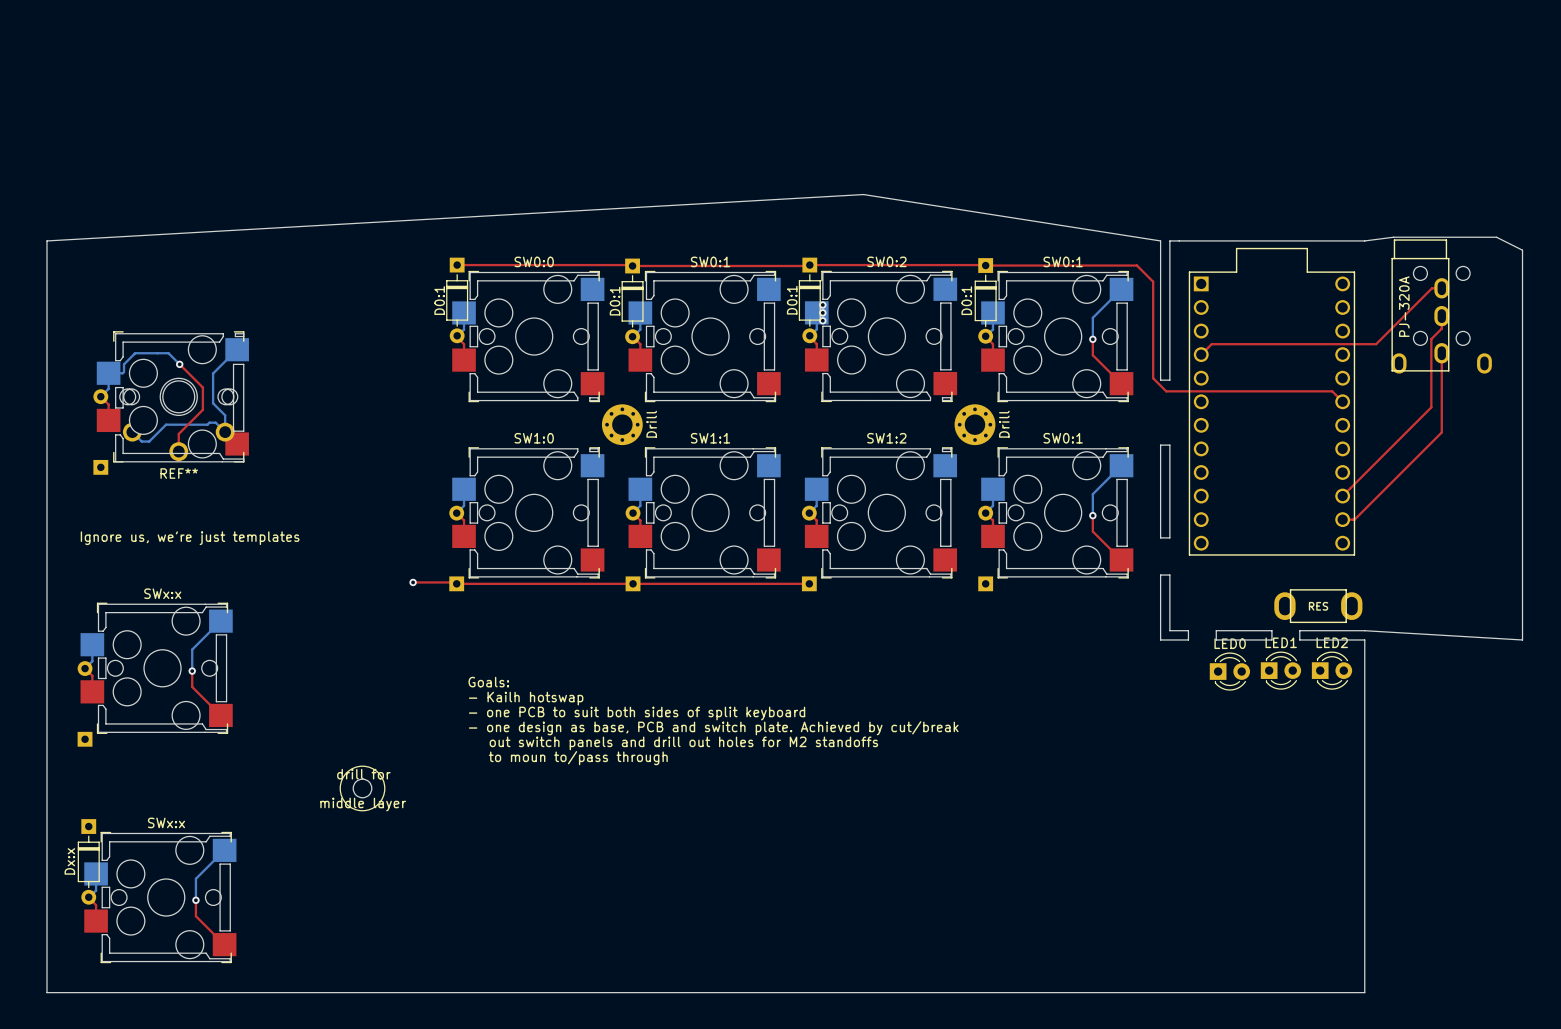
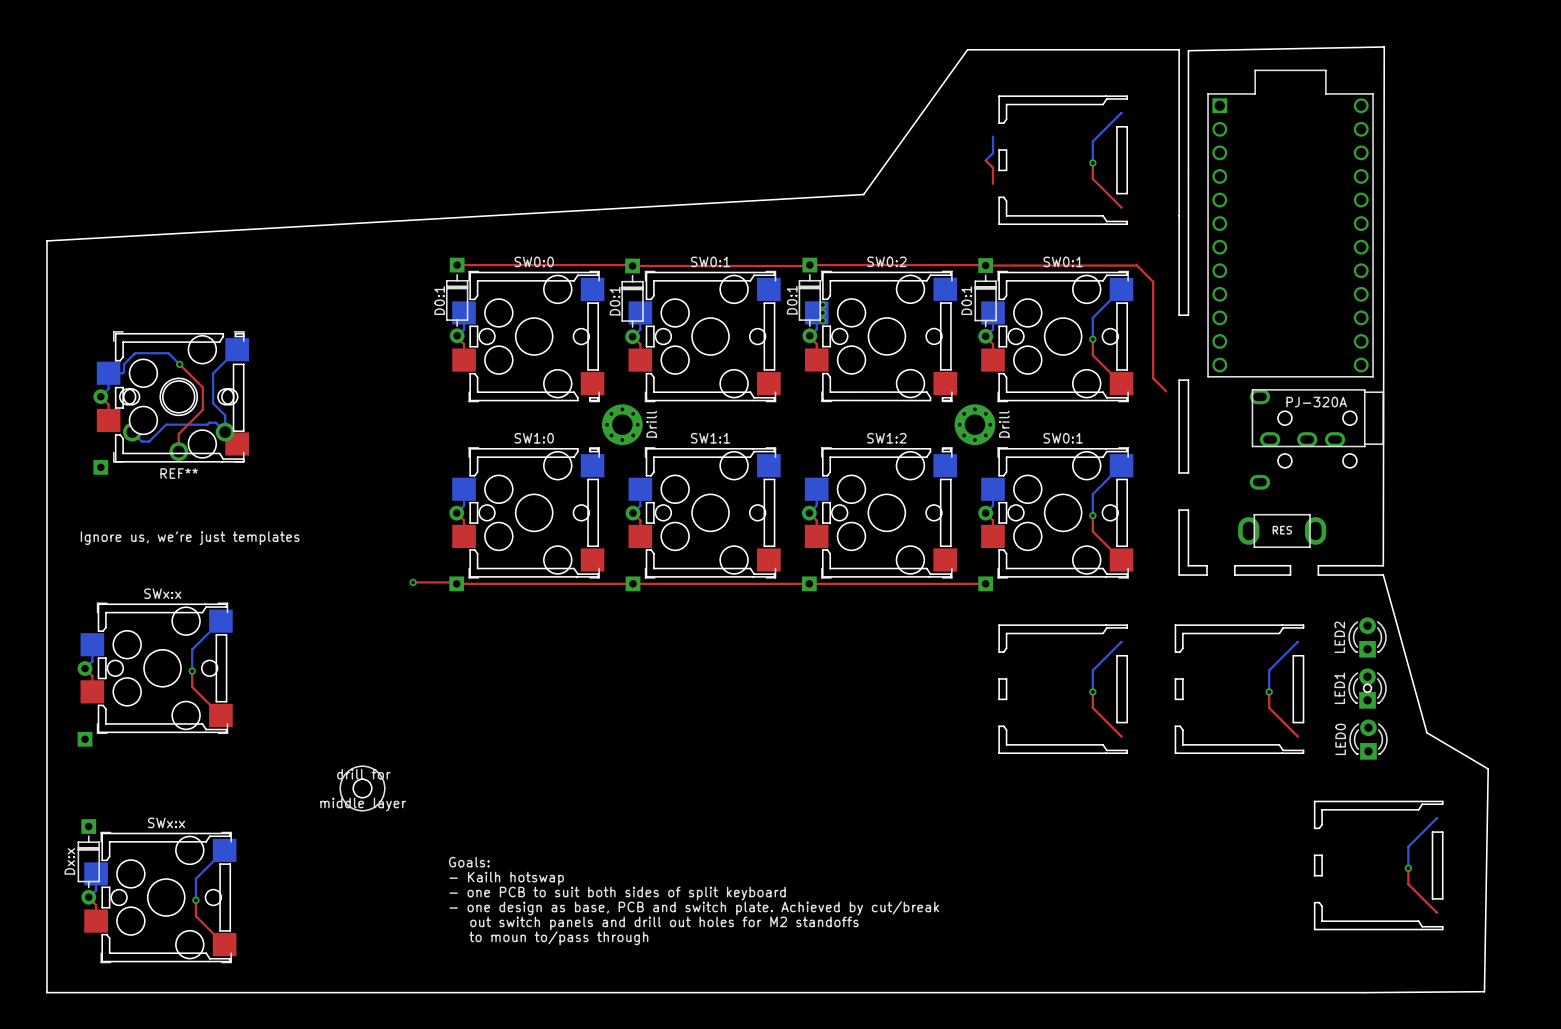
board edge: none -> (999, 96) (999, 123) (1003, 123) (1006, 119) (1006, 104) (1103, 104) (1106, 98) (1127, 98) (1127, 96) (999, 96)
bottom track: none -> (1121, 113) (1092, 141) (1092, 162)
board edge: none -> (1116, 126) (1127, 126) (1127, 193) (1116, 193) (1116, 126)
bottom track: none -> (993, 136) (993, 153) (985, 160)
board edge: none -> (999, 150) (999, 170) (1006, 170) (1006, 150) (999, 150)
top track: none -> (985, 160) (993, 167) (993, 183)
top track: none -> (1092, 162) (1092, 178) (1121, 207)
via: none -> (1092, 162)
board edge: (863, 194) (1160, 240) (1160, 380) (1169, 380) (1169, 240) (1364, 240) (1393, 237) (1496, 237) (1522, 250) (1522, 639) (1364, 630) (1299, 630) (1299, 639) (1364, 639) (1364, 992) -> (863, 194) (967, 49) (1179, 49) (1179, 315) (1188, 315) (1188, 50) (1384, 46) (1383, 565) (1318, 565) (1318, 575) (1383, 575) (1426, 732) (1488, 768) (1484, 991) (1364, 992)
board edge: none -> (999, 197) (999, 224) (1127, 224) (1127, 221) (1106, 221) (1103, 215) (1006, 215) (1006, 201) (1003, 197) (999, 197)
top track: (1441, 288) (1432, 288) (1376, 344) (1211, 344) (1201, 354) -> none
part rotation: 0° (1441, 306) -> 90° clockwise (1316, 439)
part position: (1441, 306) -> (1316, 439)
top track: (1441, 316) (1441, 328) (1431, 339) (1431, 407) (1342, 496) -> none
top track: (1441, 353) (1441, 432) (1354, 519) (1342, 519) -> none
top track: (1166, 391) (1332, 391) (1342, 401) -> none
part position: (1271, 401) -> (1290, 223)
board edge: (1160, 445) (1169, 445) (1169, 537) (1160, 537) (1160, 445) -> (1179, 380) (1188, 380) (1188, 472) (1179, 472) (1179, 380)
board edge: (1160, 575) (1160, 639) (1188, 639) (1188, 630) (1169, 630) (1169, 575) (1160, 575) -> (1179, 510) (1179, 575) (1207, 575) (1207, 565) (1188, 565) (1188, 510) (1179, 510)
top track: none -> (809, 583) (985, 583)
part rotation: 0° (1318, 606) -> 180° (1282, 530)
part position: (1318, 606) -> (1282, 530)
board edge: none -> (999, 625) (999, 652) (1003, 652) (1006, 648) (1006, 633) (1103, 633) (1106, 627) (1127, 627) (1127, 625) (999, 625)
board edge: none -> (1175, 625) (1175, 652) (1180, 652) (1182, 648) (1182, 633) (1279, 633) (1283, 627) (1303, 627) (1303, 625) (1175, 625)
board edge: (1216, 630) (1271, 630) (1271, 639) (1216, 639) (1216, 630) -> (1234, 565) (1290, 565) (1290, 575) (1234, 575) (1234, 565)
bottom track: none -> (1121, 642) (1092, 670) (1092, 691)
bottom track: none -> (1297, 642) (1269, 670) (1269, 691)
board edge: none -> (1116, 655) (1116, 722) (1127, 722) (1127, 655) (1116, 655)
board edge: none -> (1293, 655) (1293, 722) (1303, 722) (1303, 655) (1293, 655)
LED1 rotation: 0° (1280, 670) -> 90° counterclockwise (1367, 688)
LED1 position: (1280, 670) -> (1367, 688)
LED2 rotation: 0° (1332, 670) -> 90° counterclockwise (1367, 637)
LED2 position: (1332, 670) -> (1367, 637)
LED0 rotation: 0° (1229, 671) -> 90° counterclockwise (1368, 739)
LED0 position: (1229, 671) -> (1368, 739)
board edge: none -> (999, 678) (999, 699) (1006, 699) (1006, 678) (999, 678)
board edge: none -> (1175, 678) (1182, 678) (1182, 699) (1175, 699) (1175, 678)
text position: Goals: (488, 682) -> Goals: (469, 862)
round board edge: none -> [1363, 684, 1372, 693]
top track: none -> (1092, 691) (1092, 707) (1121, 736)
via: none -> (1092, 691)
top track: none -> (1269, 691) (1269, 707) (1297, 736)
via: none -> (1269, 691)
text position: - Kailh hotswap (526, 698) -> - Kailh hotswap (506, 878)
text position: - one PCB to suit both sides of split keyboard (637, 713) -> - one PCB to suit both sides of split keyboard (617, 893)
board edge: none -> (999, 726) (999, 753) (1127, 753) (1127, 750) (1106, 750) (1103, 744) (1006, 744) (1006, 730) (1003, 726) (999, 726)
board edge: none -> (1175, 726) (1175, 753) (1303, 753) (1303, 750) (1283, 750) (1279, 744) (1182, 744) (1182, 730) (1180, 726) (1175, 726)
text position: - one design as base, PCB and switch plate. Achieved by cut/break (713, 728) -> - one design as base, PCB and switch plate. Achieved by cut/break (694, 908)
text position: out switch panels and drill out holes for M2 standoffs (683, 743) -> out switch panels and drill out holes for M2 standoffs (664, 923)
text position: to moun to/pass through (578, 758) -> to moun to/pass through (558, 938)
board edge: none -> (1314, 801) (1314, 828) (1319, 828) (1322, 824) (1322, 809) (1418, 809) (1422, 804) (1442, 804) (1442, 801) (1314, 801)
bottom track: none -> (1437, 818) (1408, 846) (1408, 868)
board edge: none -> (1432, 832) (1432, 898) (1442, 898) (1442, 832) (1432, 832)
board edge: none -> (1314, 855) (1314, 875) (1322, 875) (1322, 855) (1314, 855)
top track: none -> (1408, 868) (1408, 884) (1437, 912)
via: none -> (1408, 868)
board edge: none -> (1314, 902) (1314, 929) (1442, 929) (1442, 926) (1422, 926) (1418, 921) (1322, 921) (1322, 906) (1319, 902) (1314, 902)

